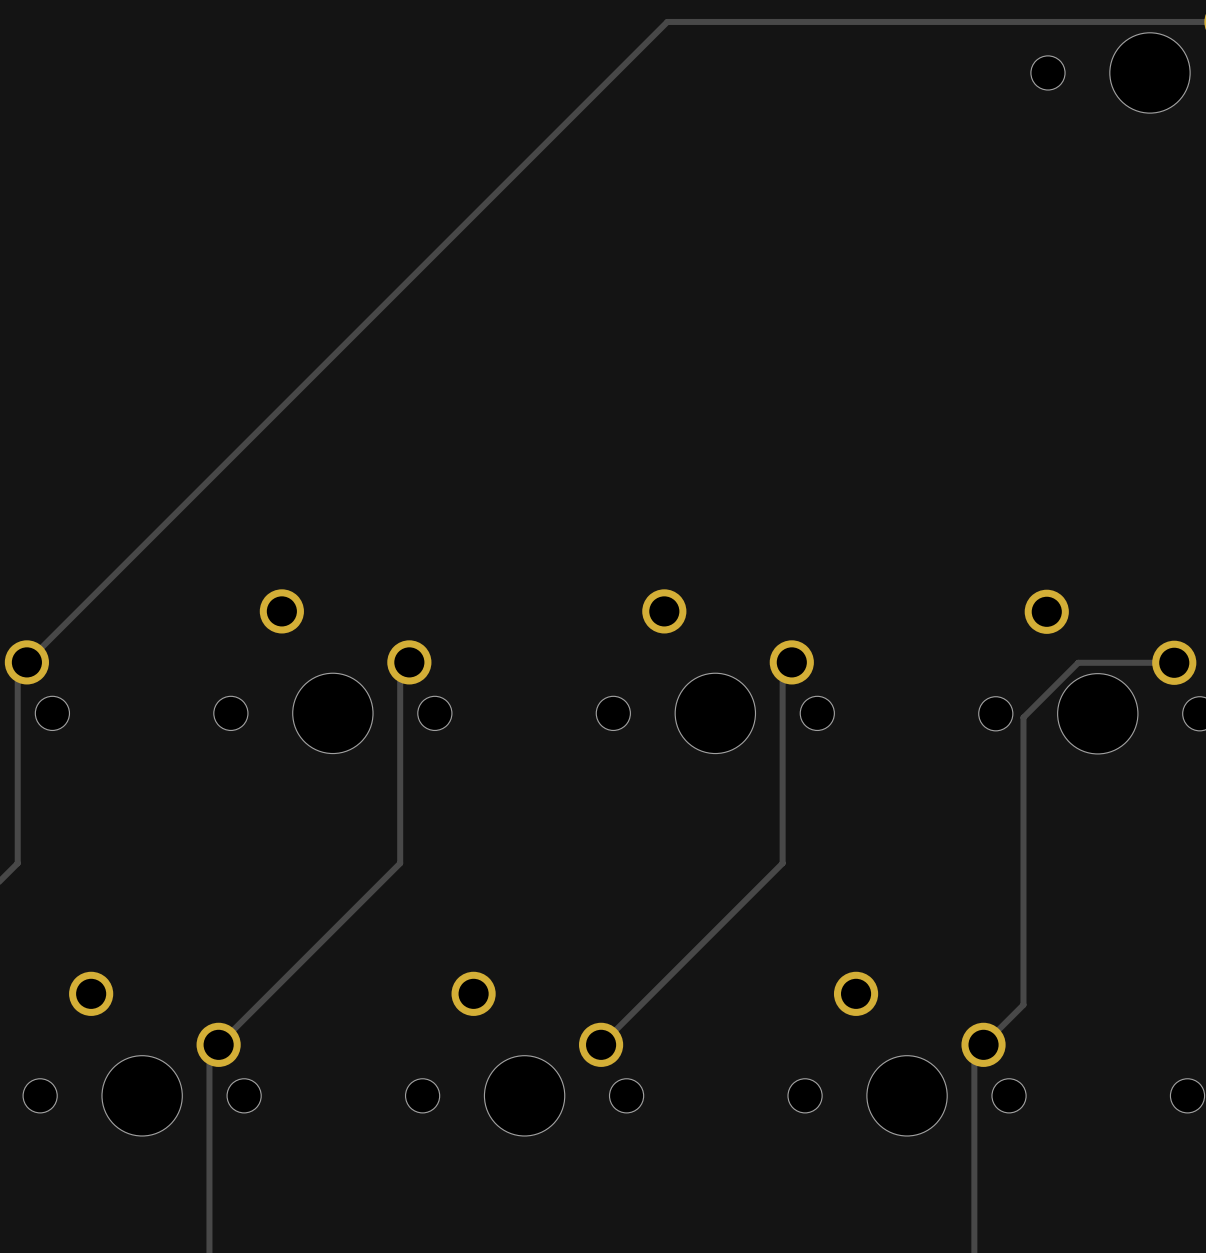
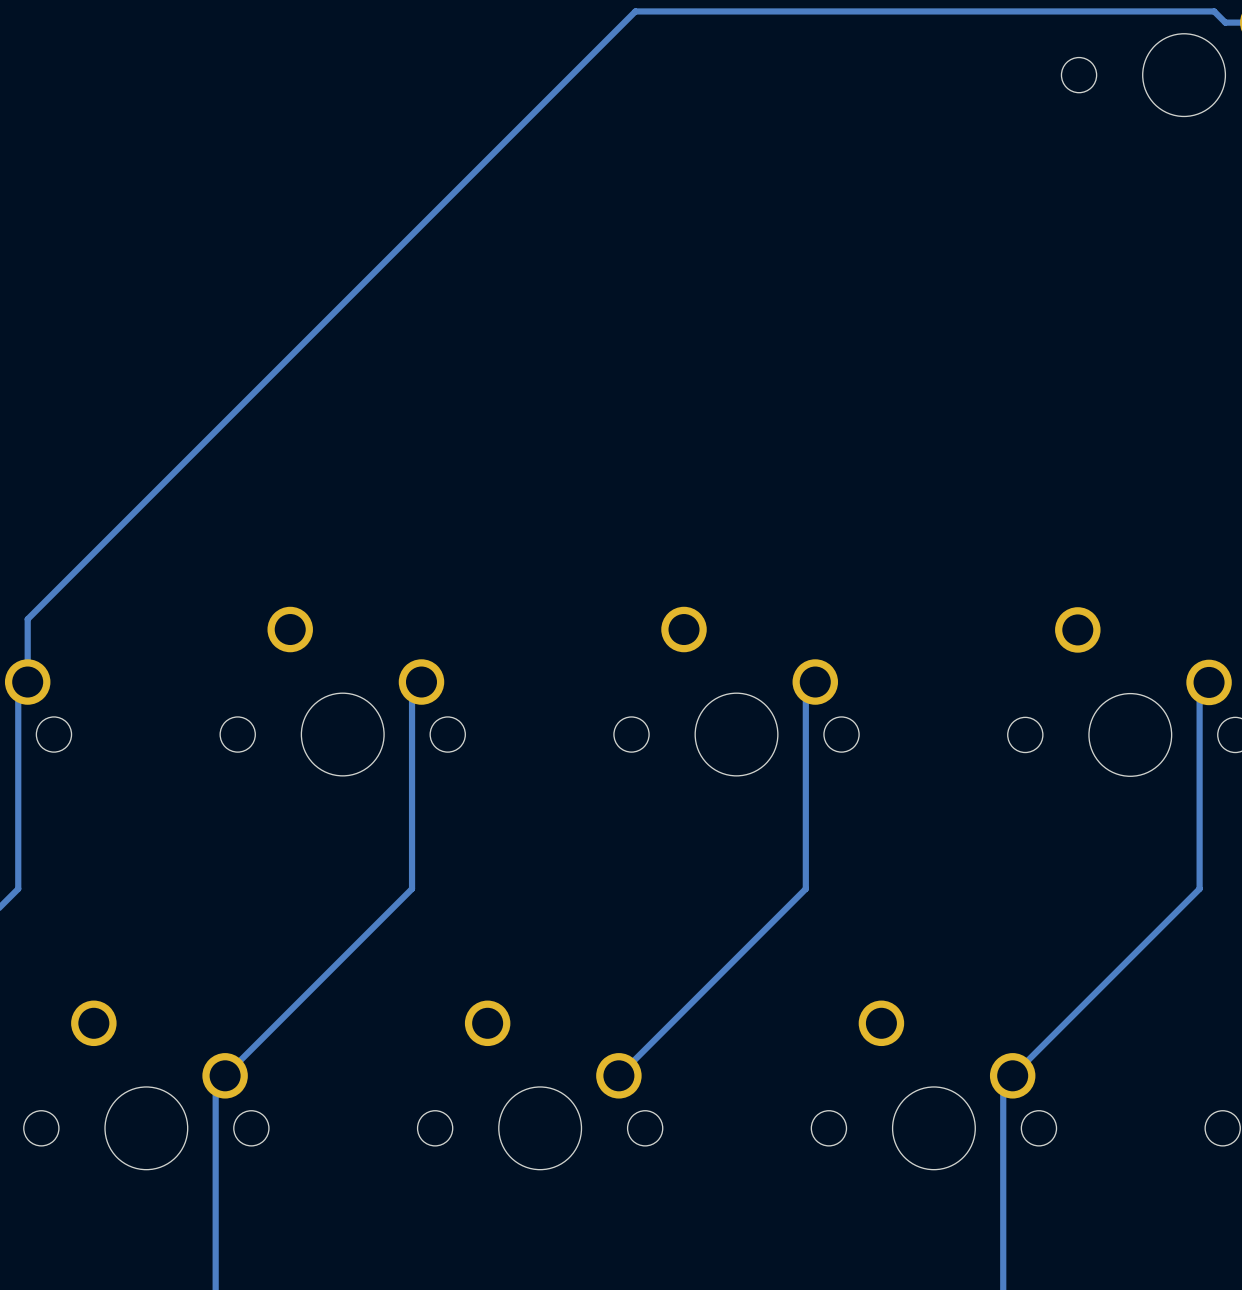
track: (1190, 21) (667, 21) (17, 671) -> (1225, 22) (1214, 11) (635, 11) (27, 619) (27, 682) (18, 691)
track: (1174, 662) (1078, 662) (1023, 717) (1023, 1004) (974, 1054) -> (1209, 682) (1199, 691) (1199, 888) (1003, 1085)

